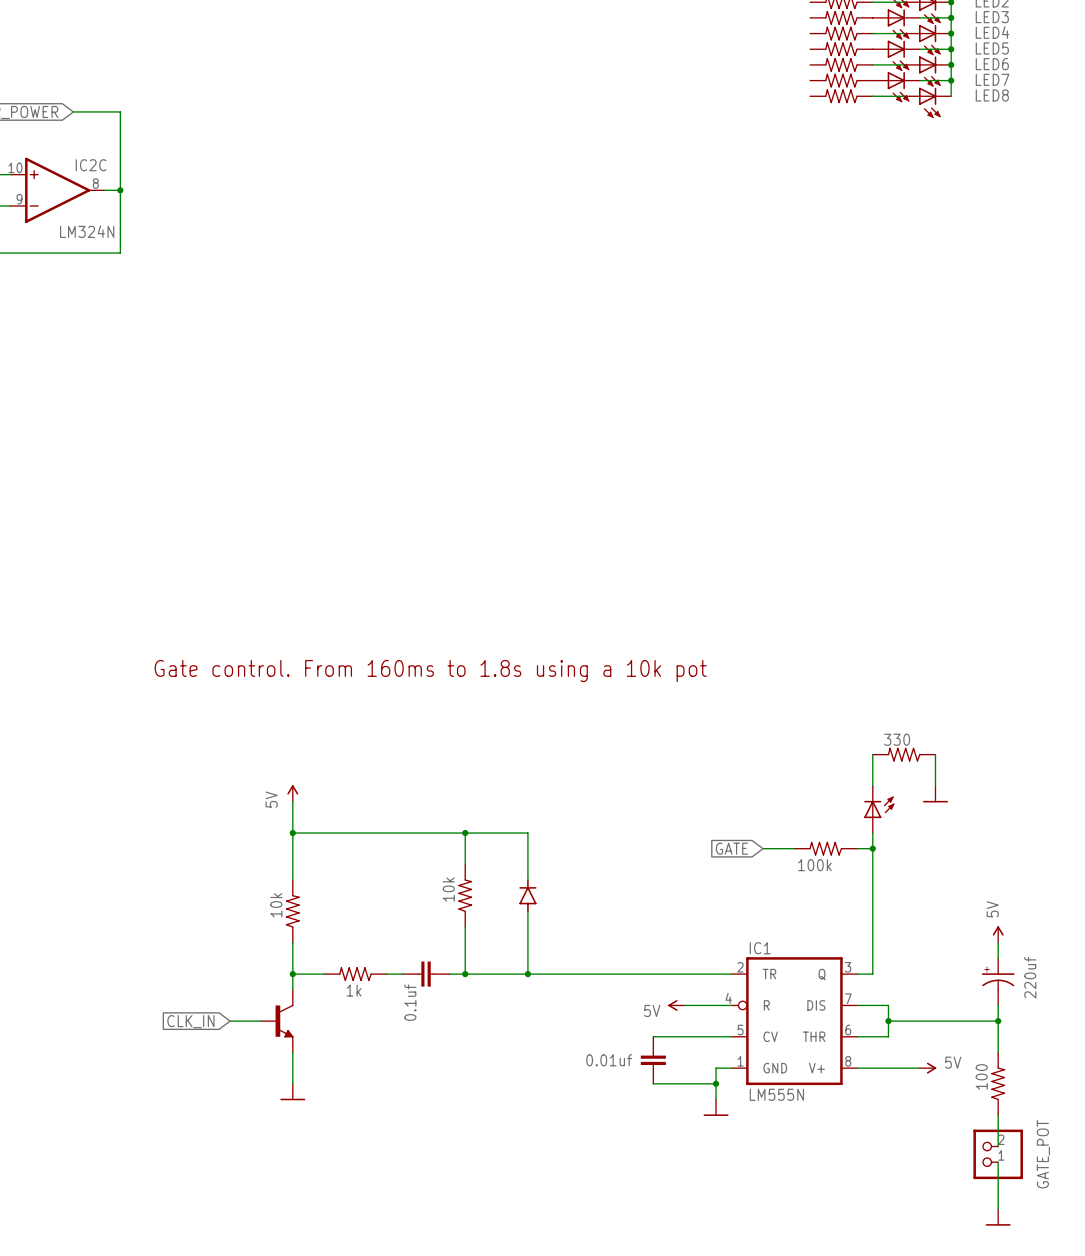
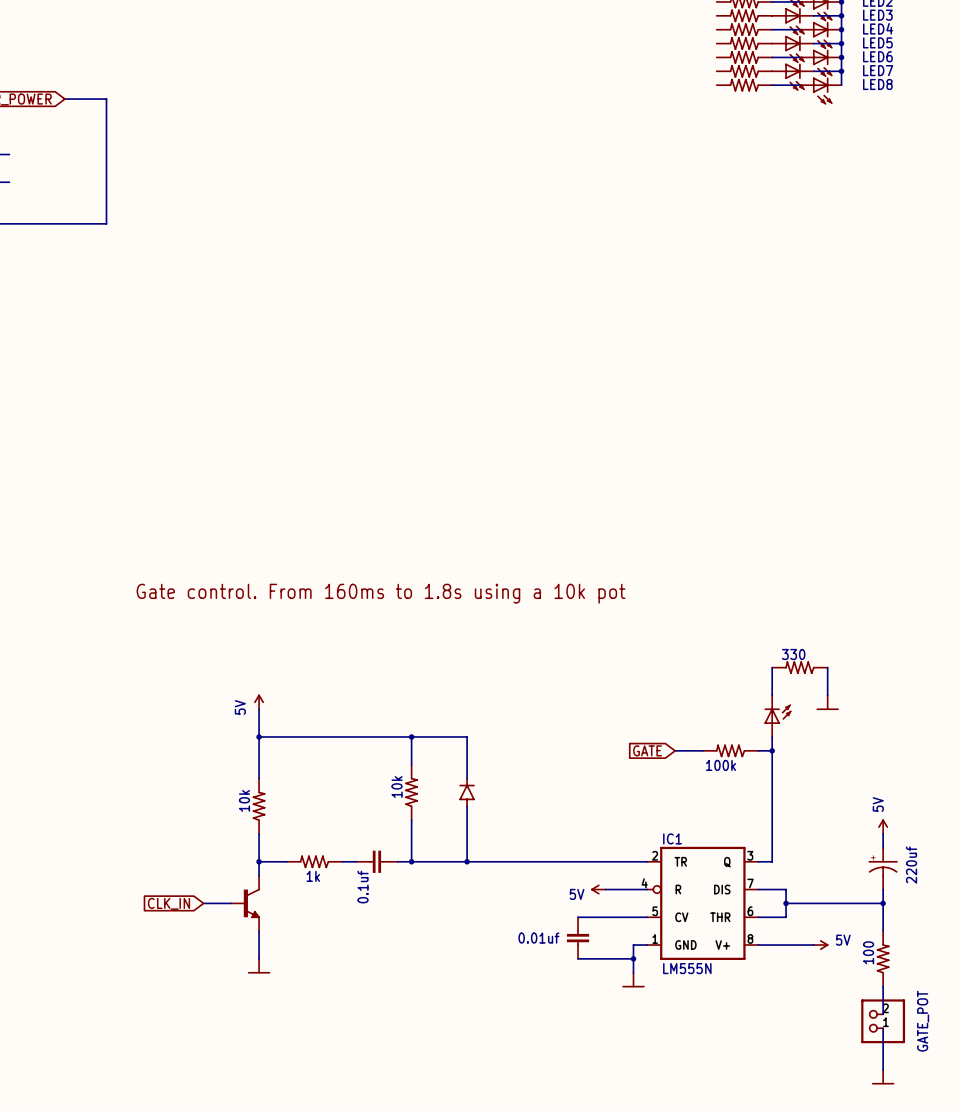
IC2C: LM324N (57, 190) -> none
wire: (104, 190) (120, 190) -> none
junction: (120, 190) -> none

